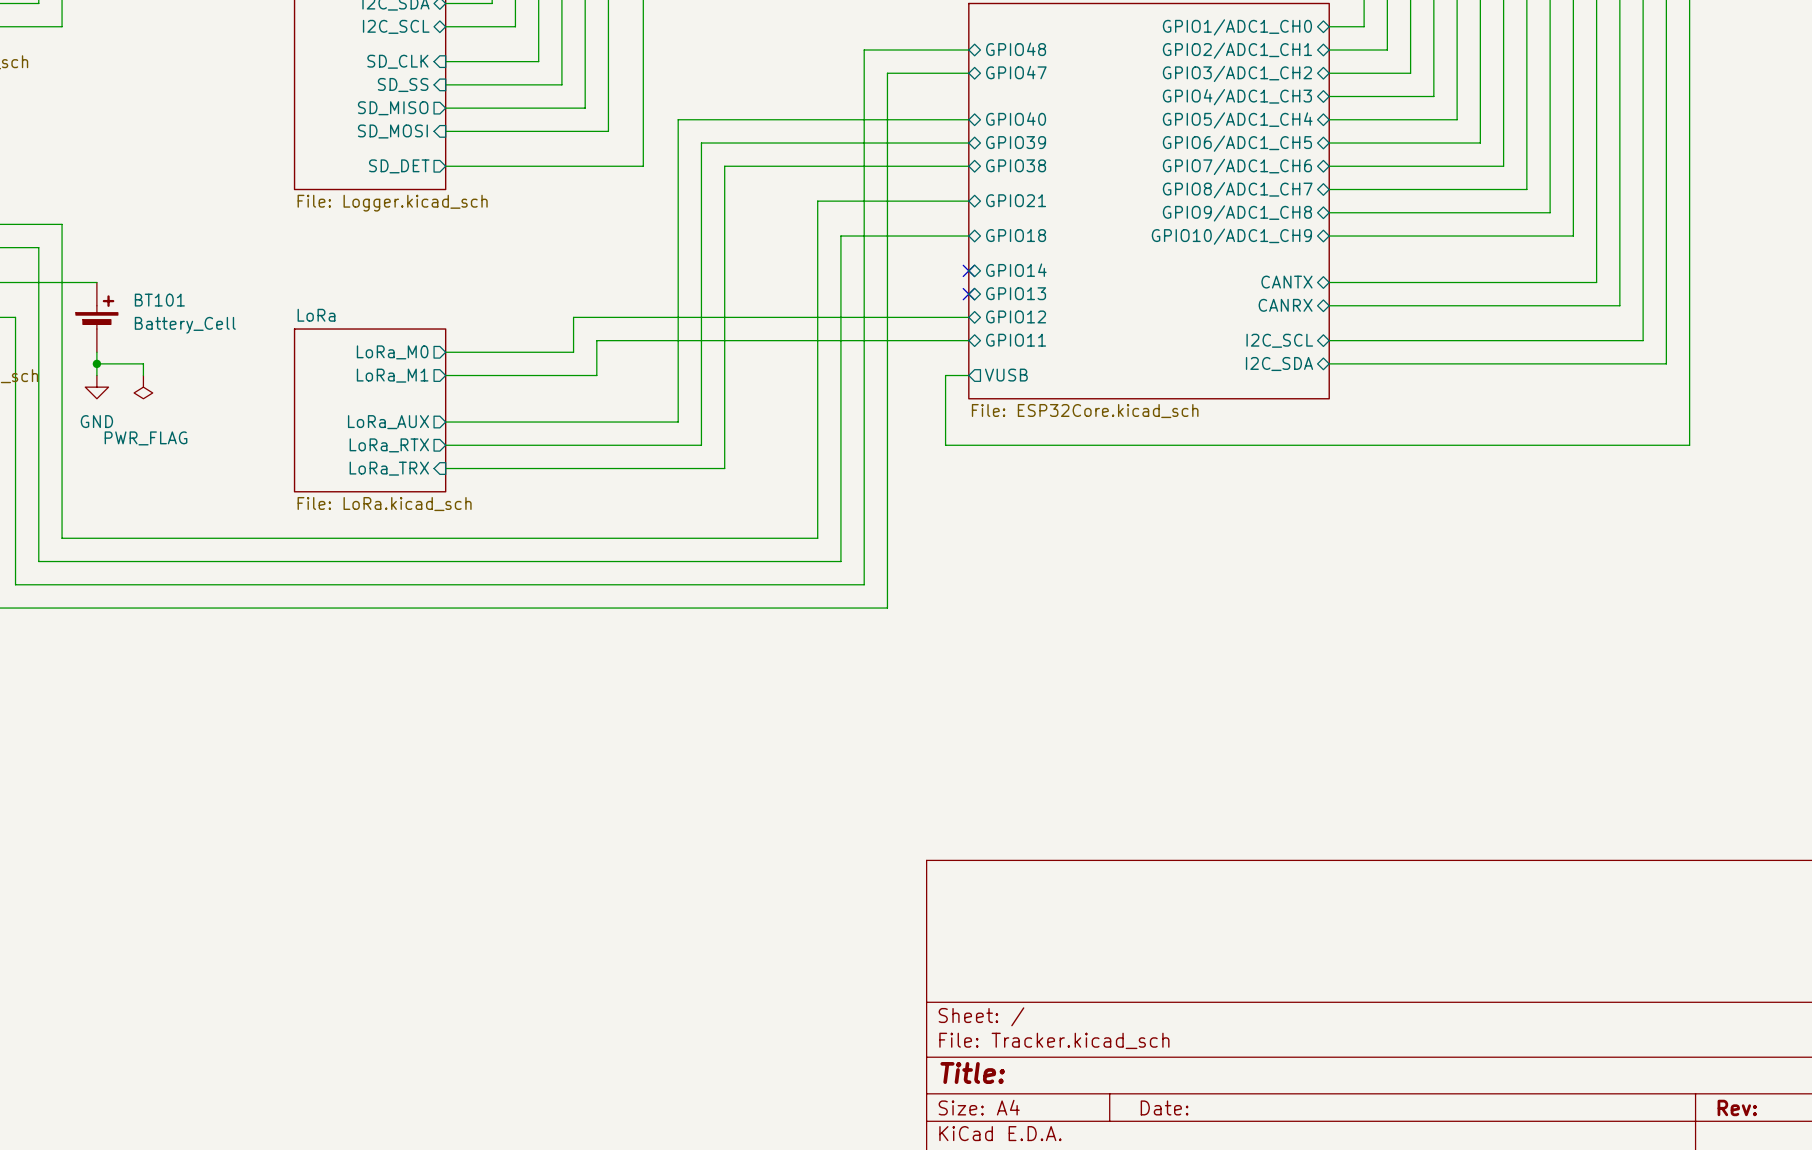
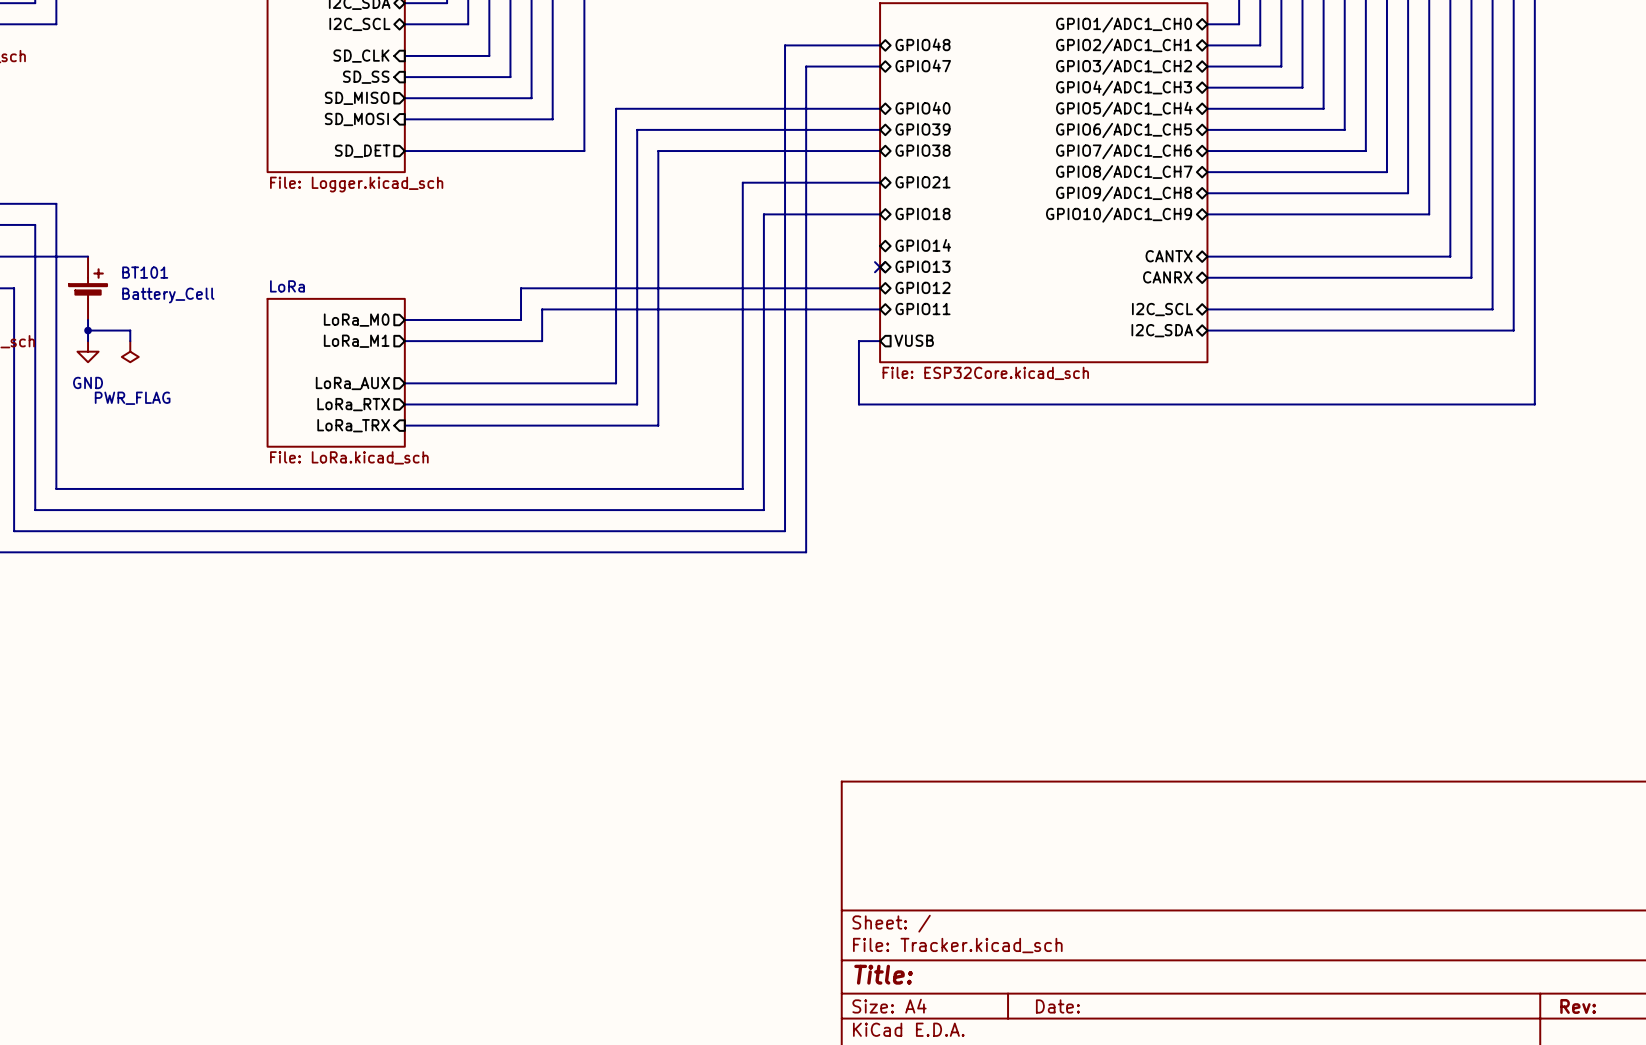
no-connect mark: (968, 270) -> none

